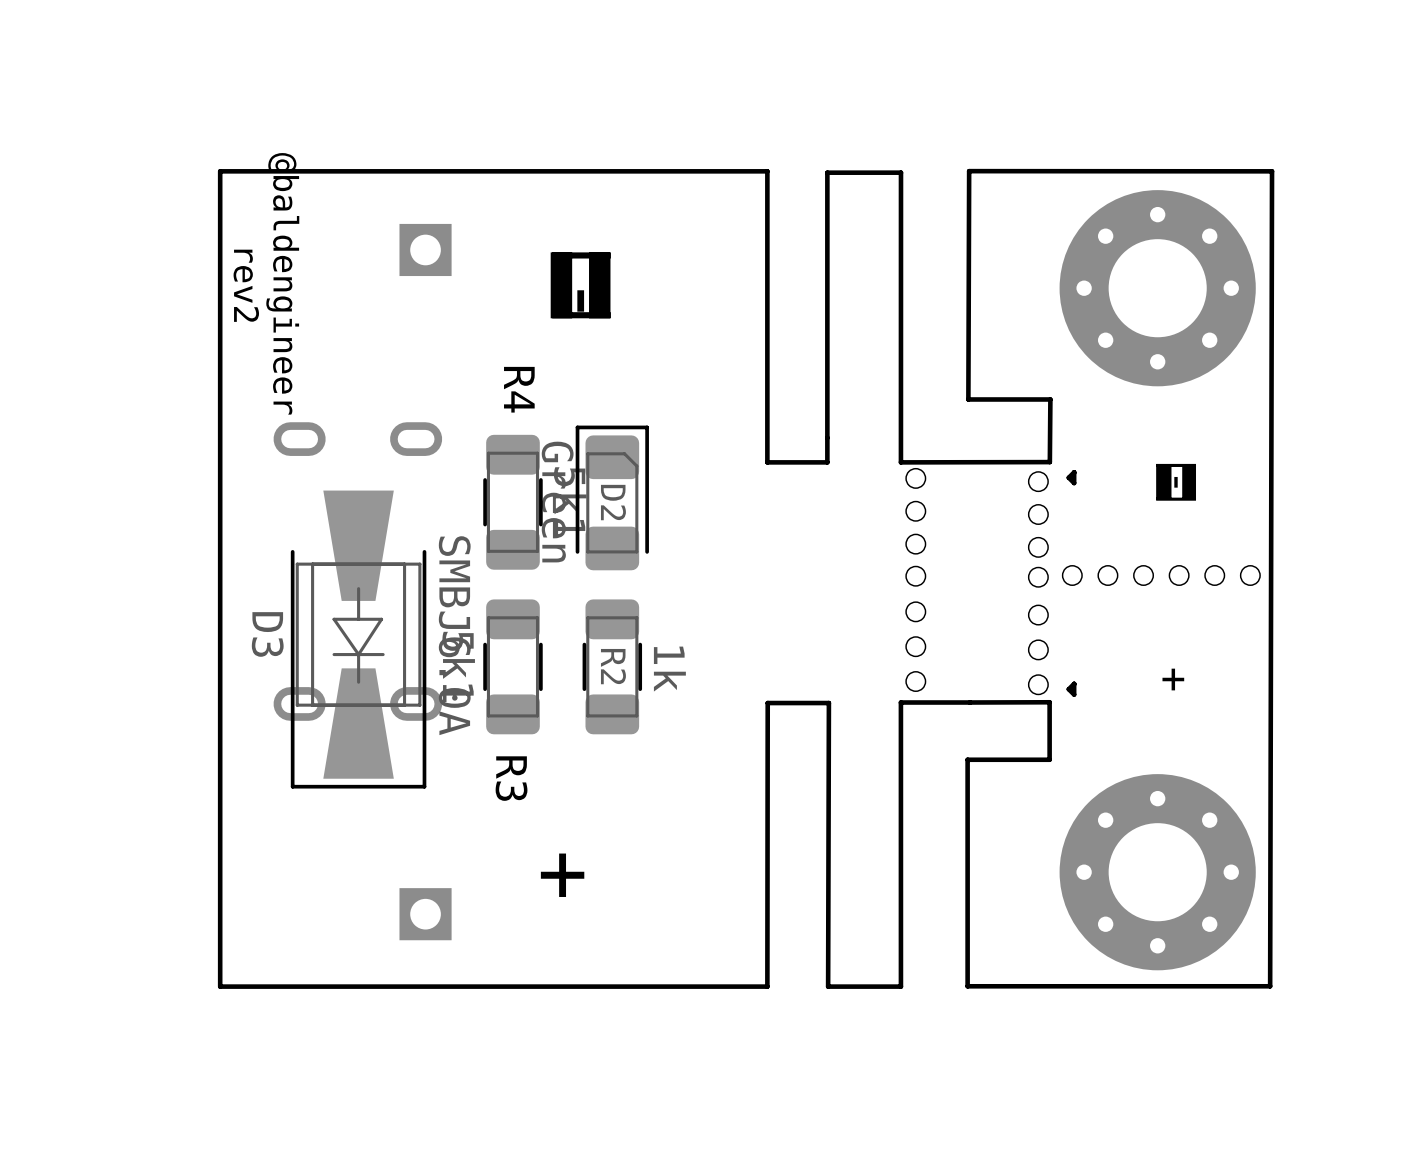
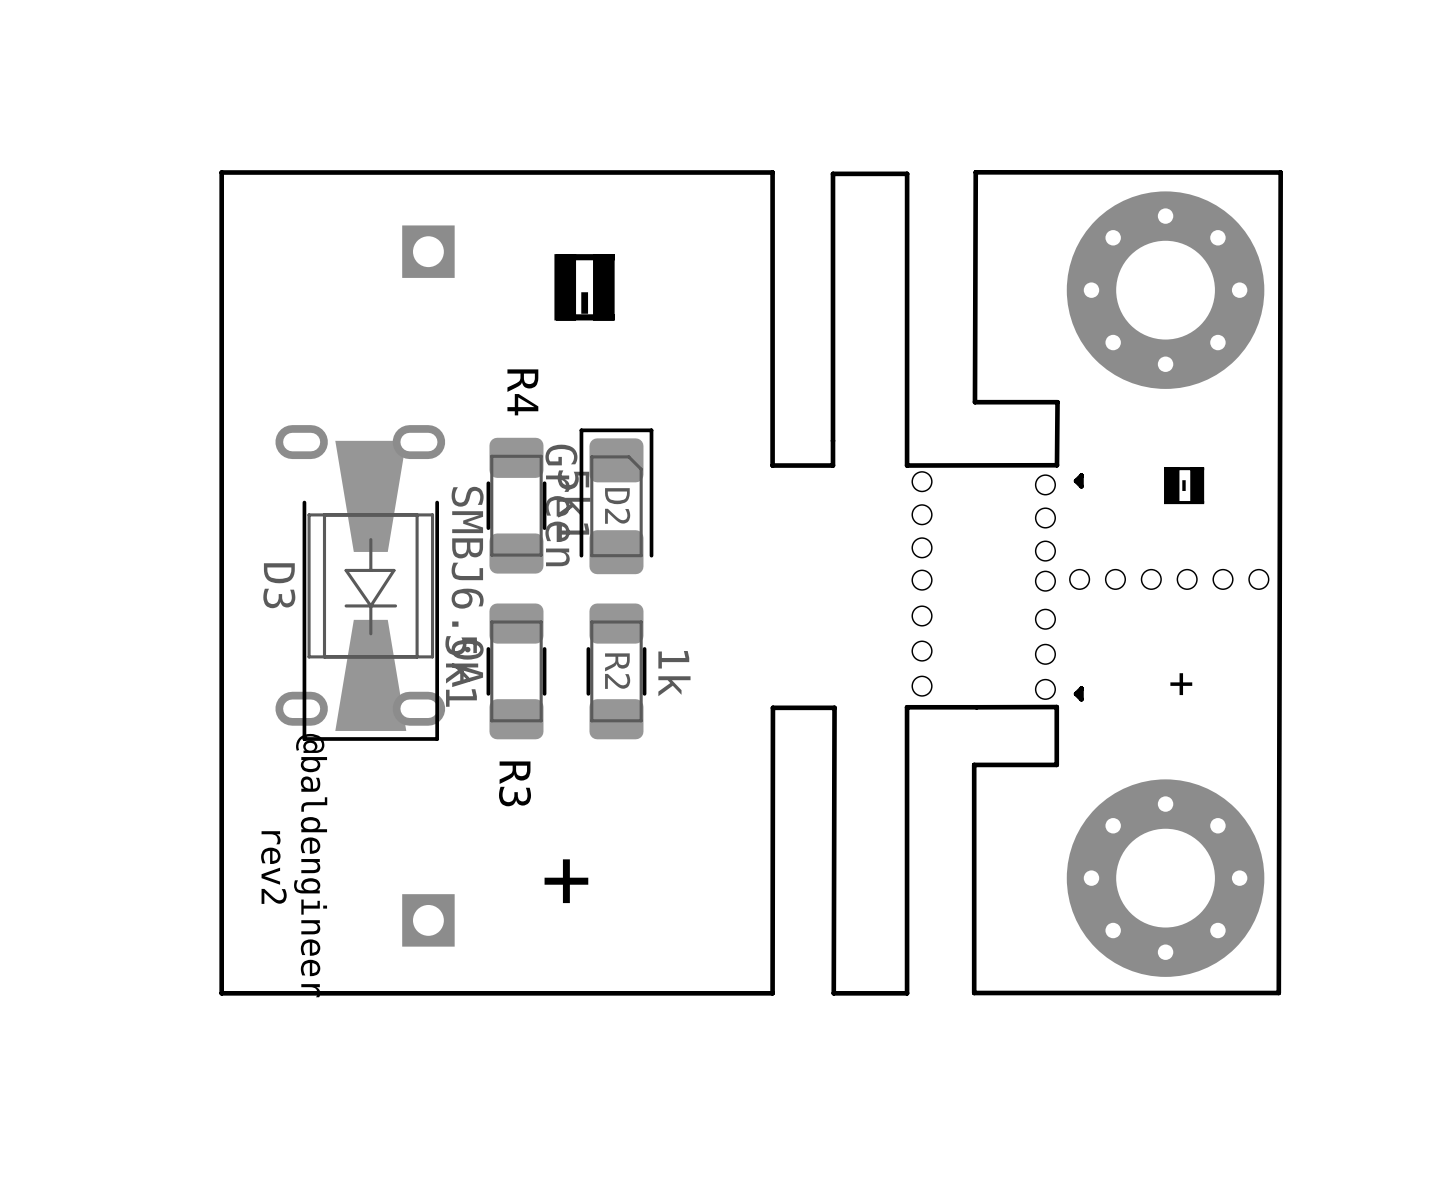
text position: @baldengineer (282, 283) -> @baldengineer (310, 865)
text position: rev2 (246, 285) -> rev2 (273, 867)
D3 position: (358, 639) -> (370, 590)

